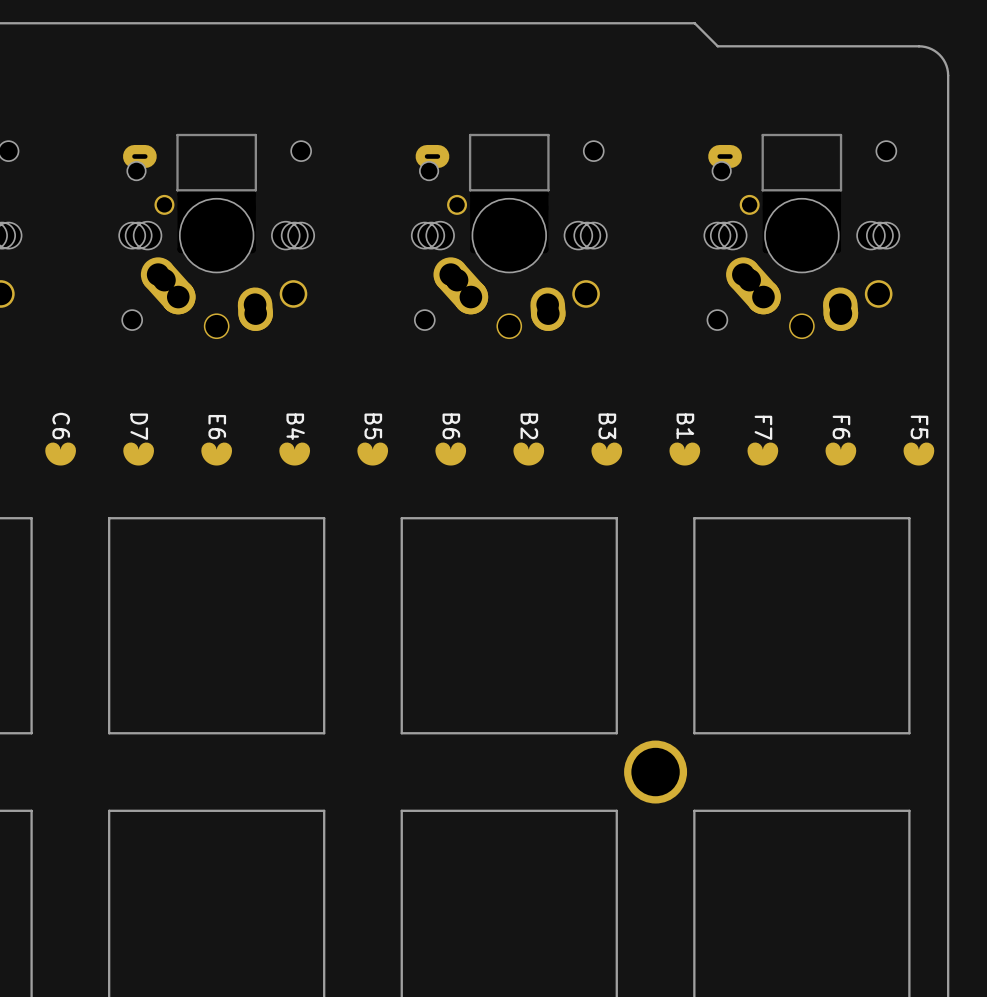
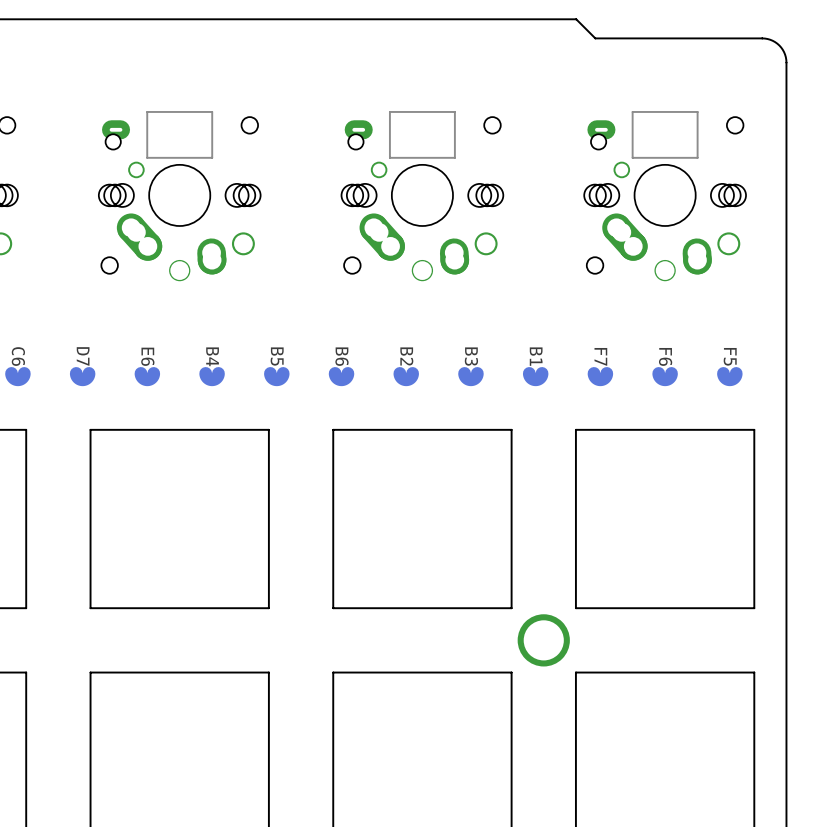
part position: (60, 454) -> (17, 376)
part position: (138, 454) -> (82, 376)
part position: (216, 454) -> (147, 376)
part position: (294, 454) -> (212, 376)
part position: (372, 454) -> (276, 376)
part position: (450, 454) -> (341, 376)
part position: (528, 454) -> (406, 376)
part position: (606, 454) -> (470, 376)
part position: (684, 454) -> (535, 376)
part position: (762, 454) -> (600, 376)
part position: (840, 454) -> (665, 376)
part position: (918, 454) -> (729, 376)

